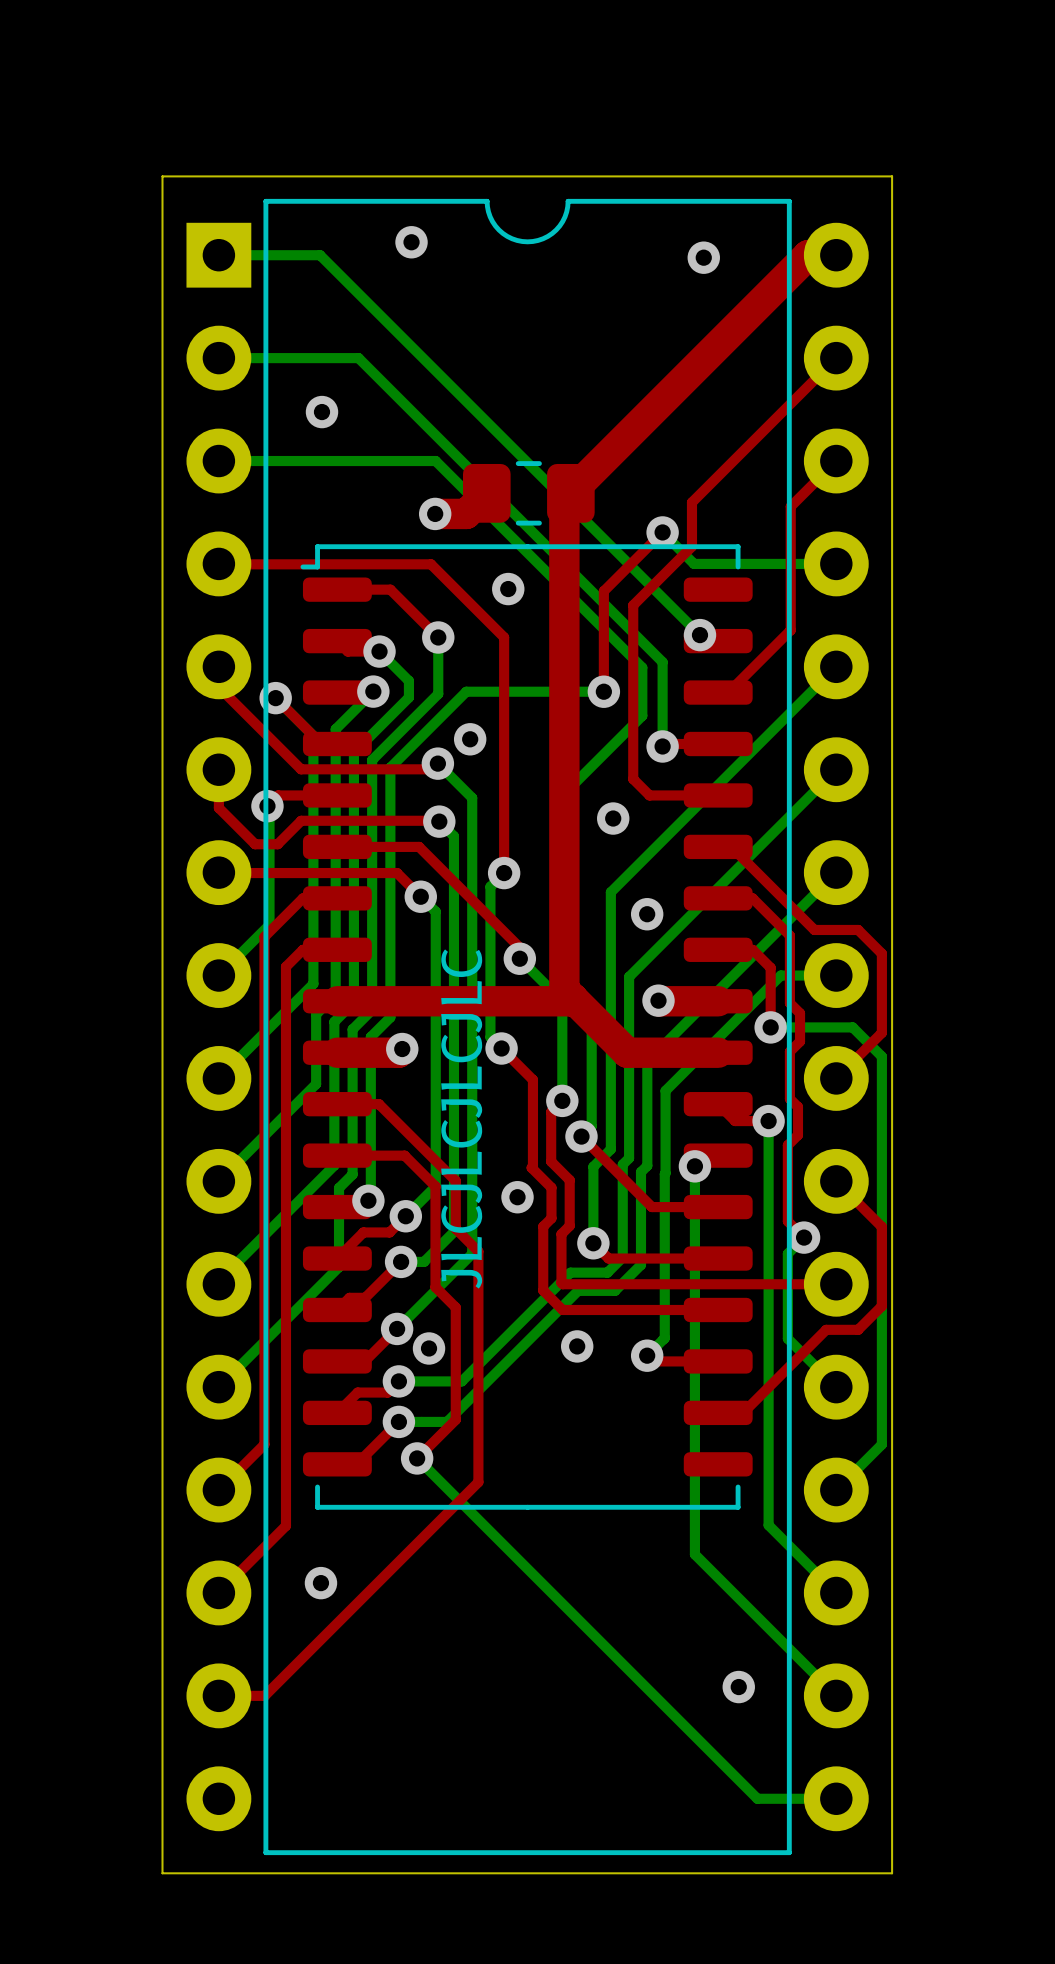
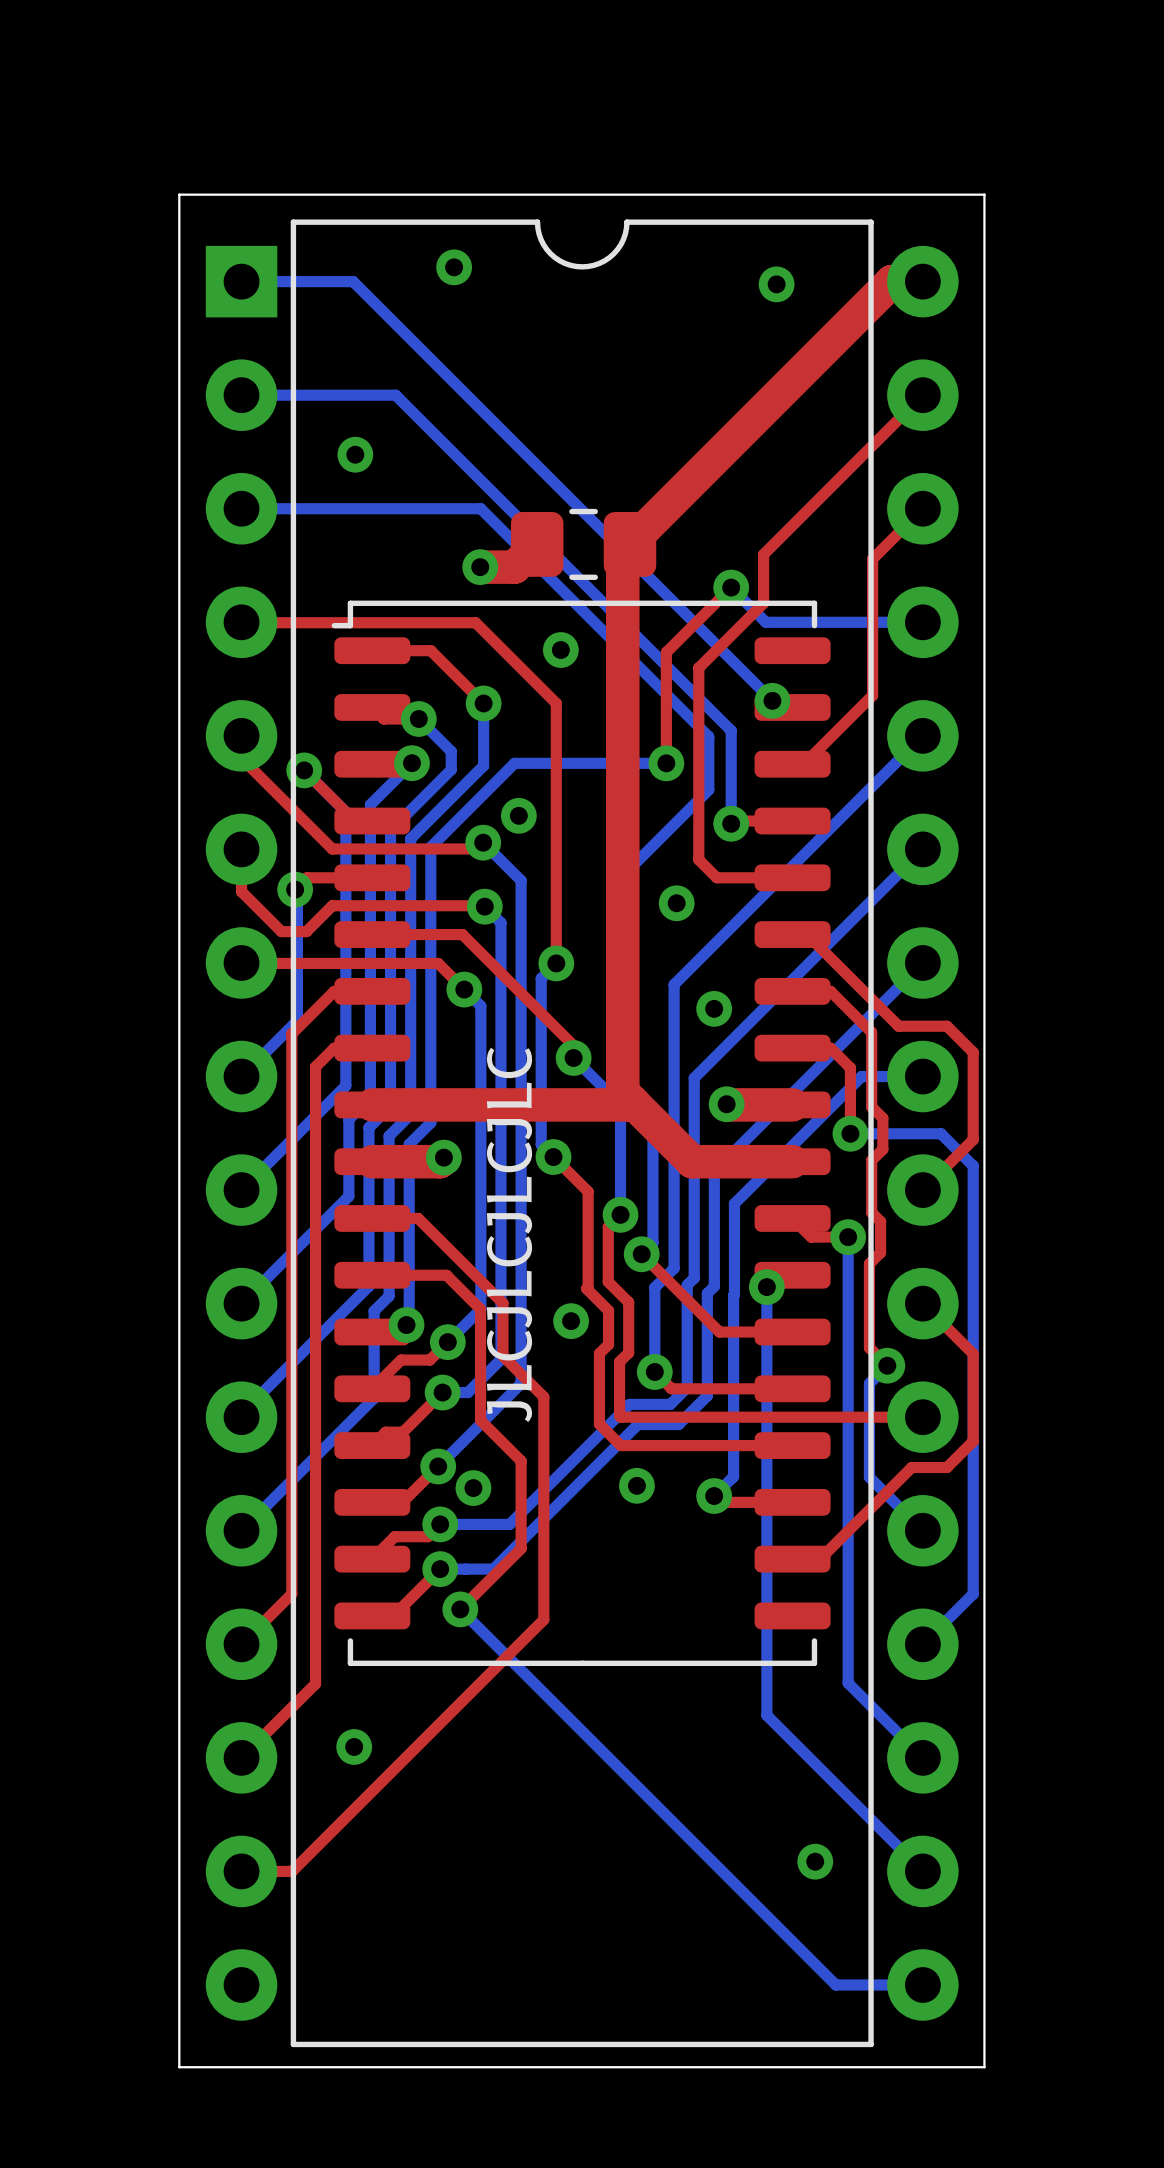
top track: (478, 1251) (478, 1482) -> (527, 1381) (543, 1396) (543, 1619) (527, 1635)
top track: (455, 1307) (455, 1419) -> (502, 1442) (521, 1461) (521, 1548) (502, 1566)

